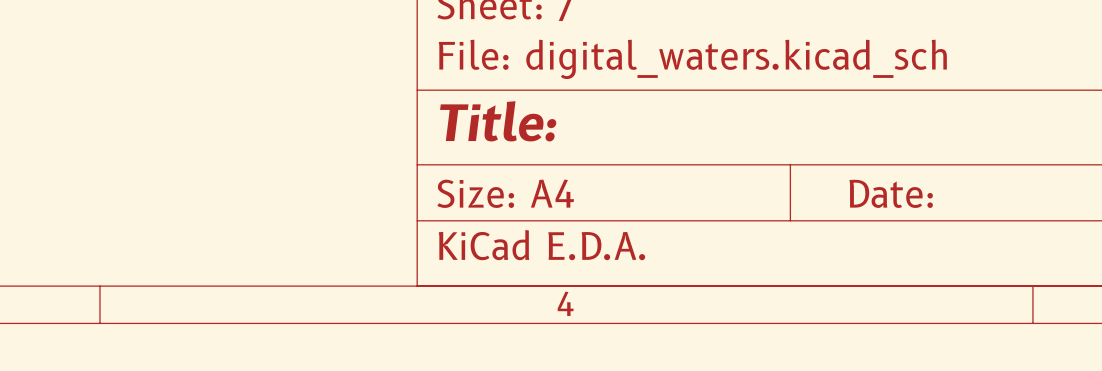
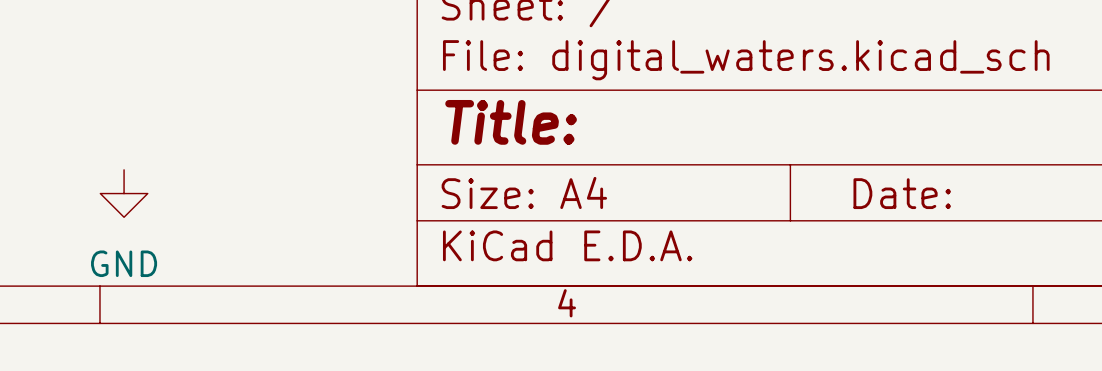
power symbol: none -> GND (124, 193)

